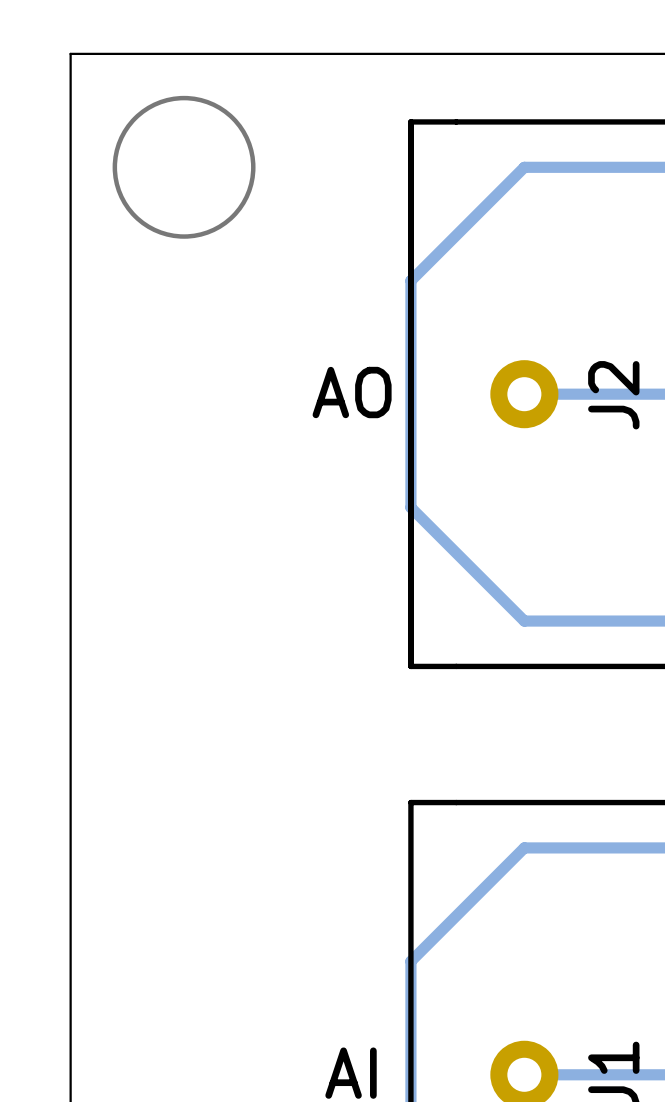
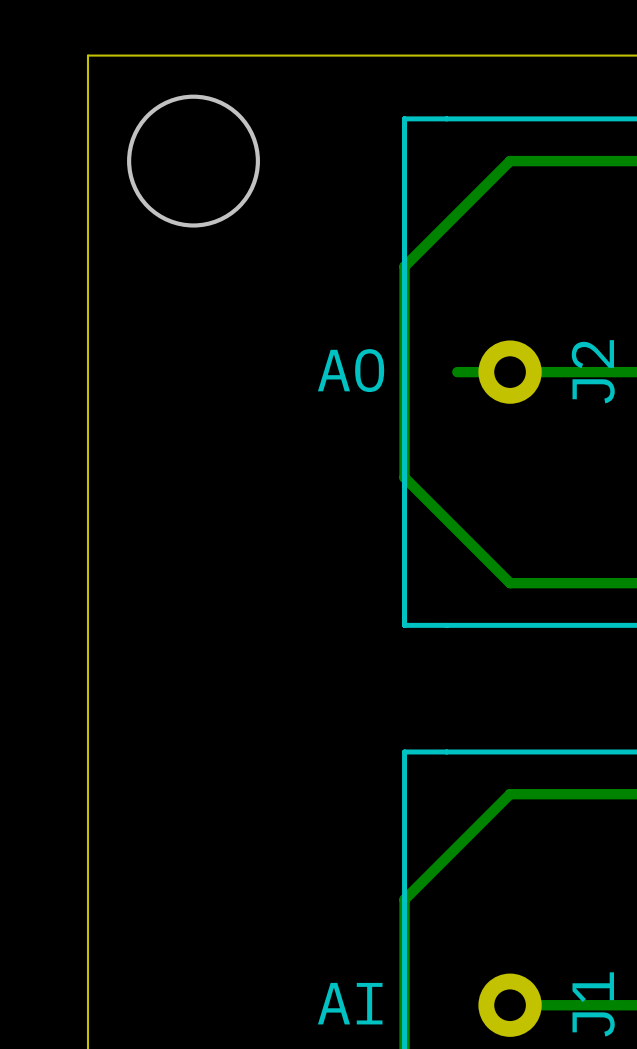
bottom track: none -> (457, 372) (510, 372)

